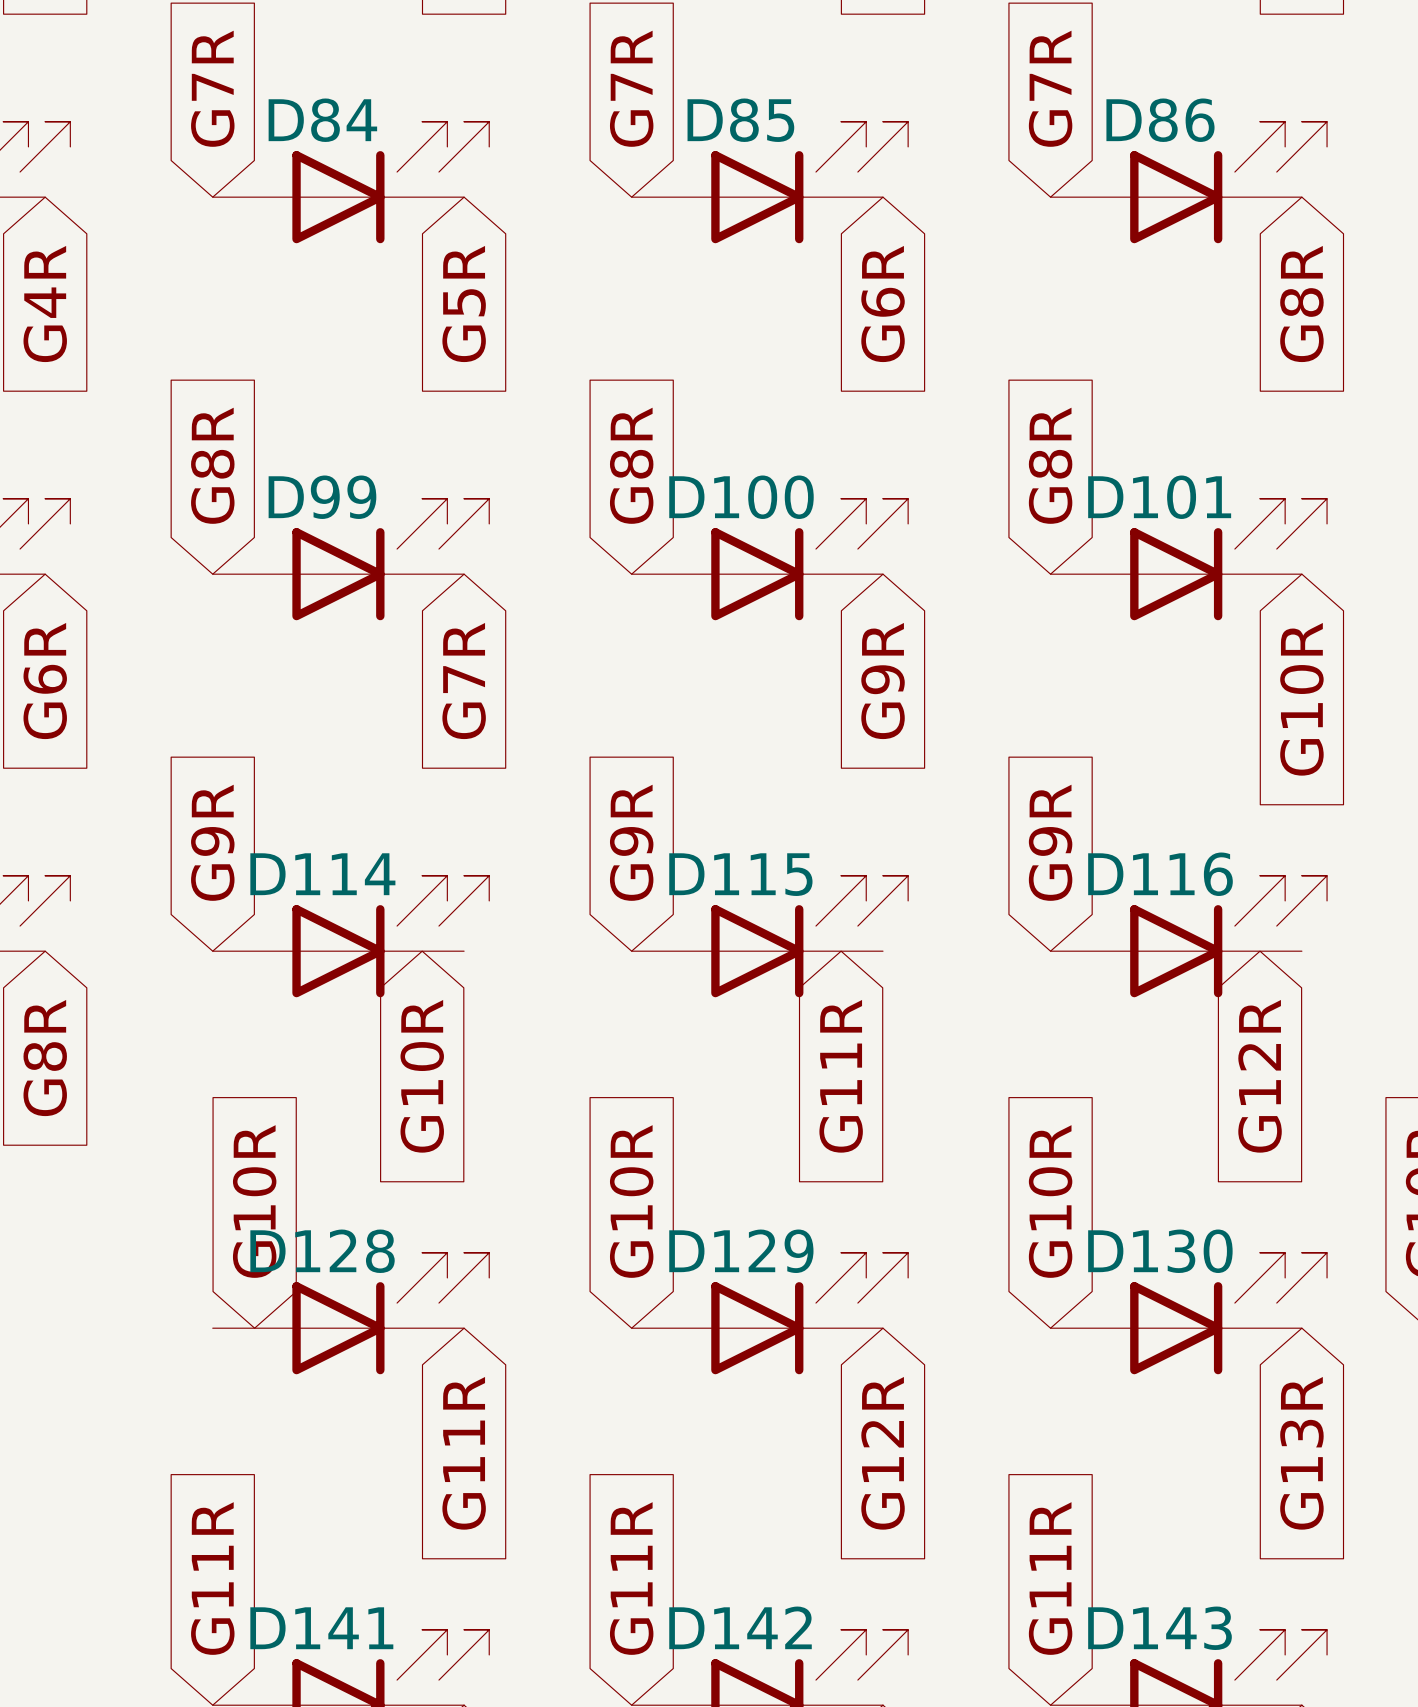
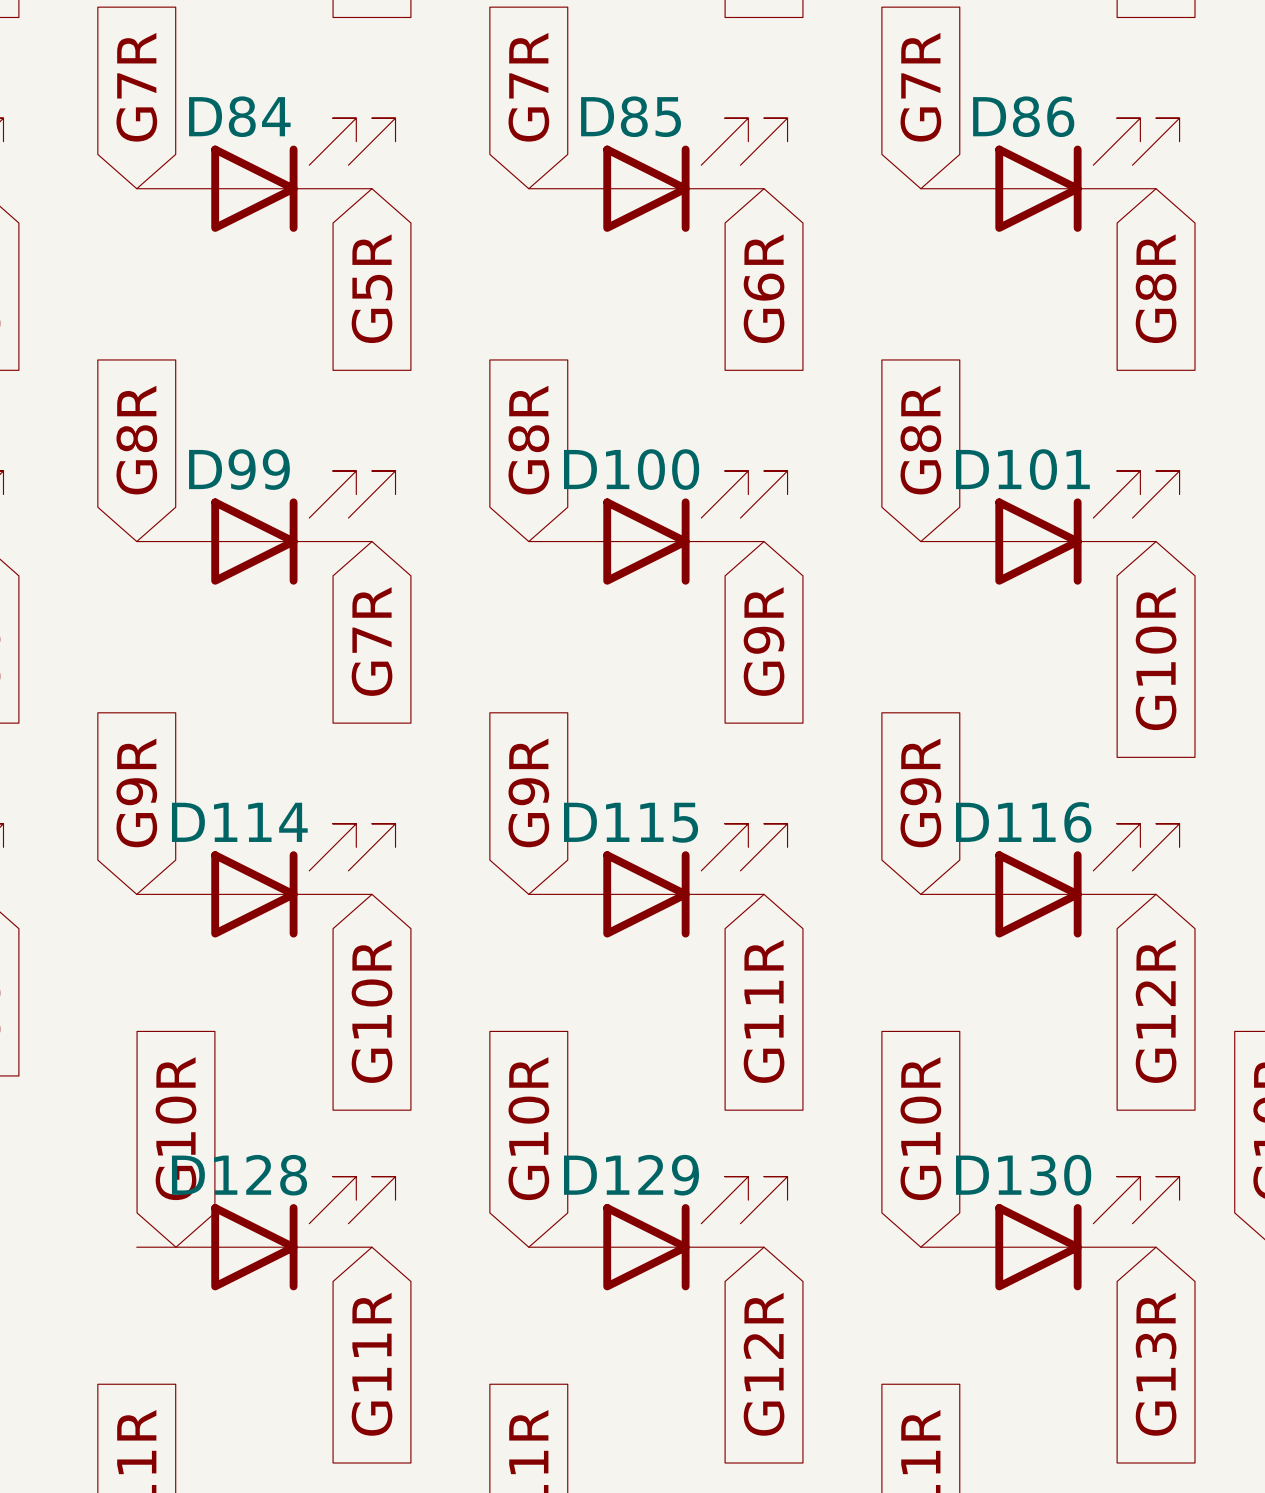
global label position: G10R (422, 1076) -> G10R (372, 1011)
global label position: G11R (841, 1076) -> G11R (764, 1011)
global label position: G12R (1260, 1076) -> G12R (1156, 1011)

